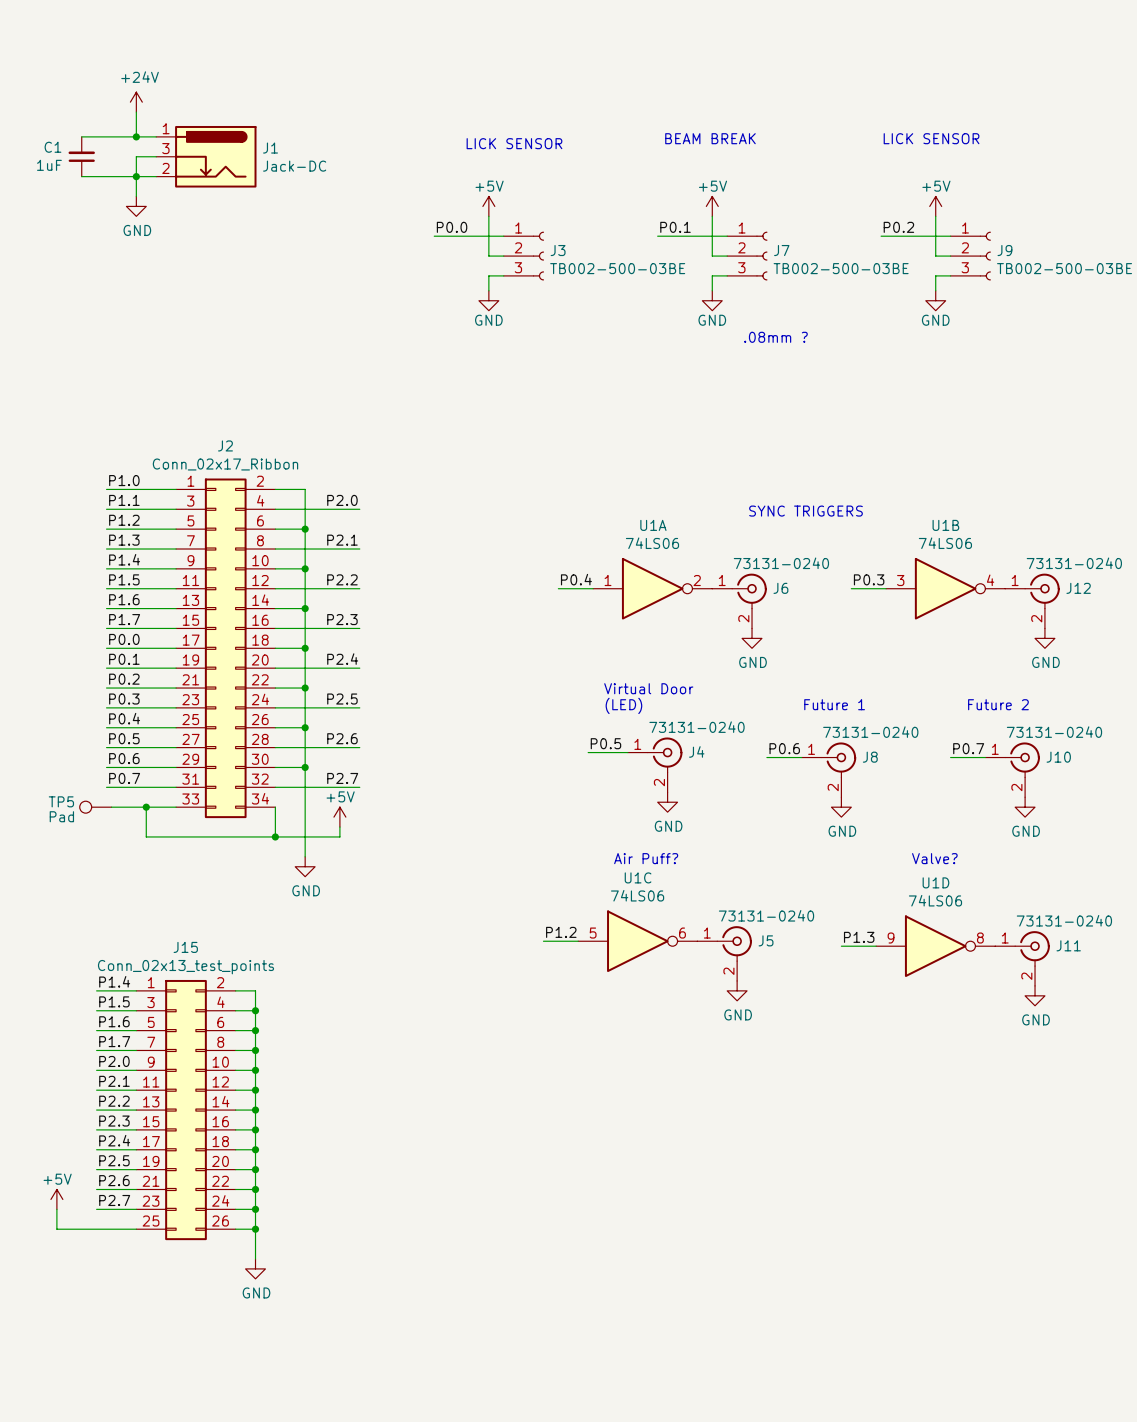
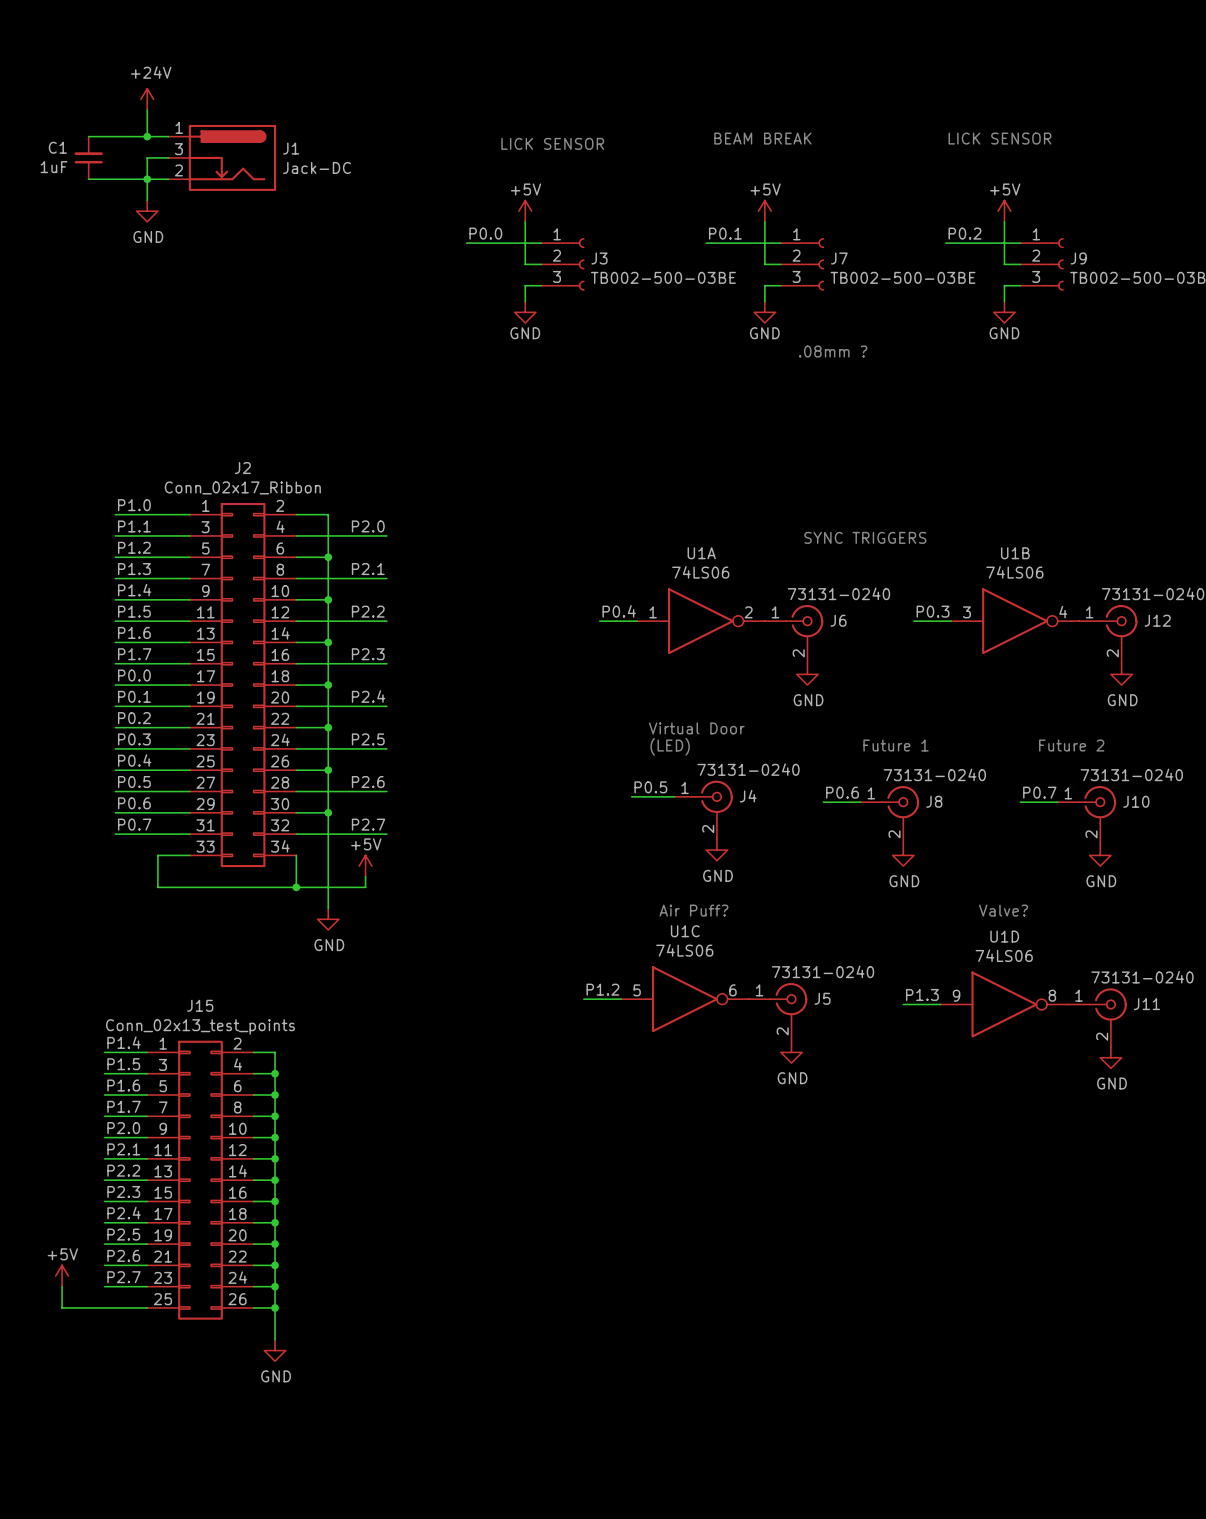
TP5: Pad (95, 807) -> none
wire: (111, 807) (146, 807) -> none
junction: (146, 807) -> none

